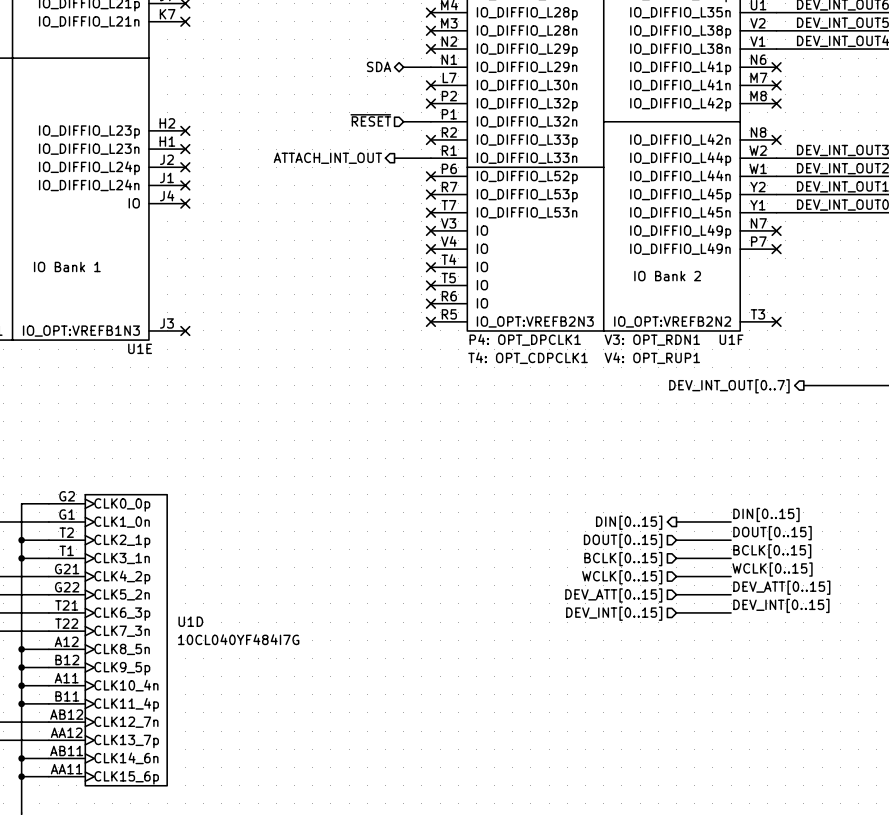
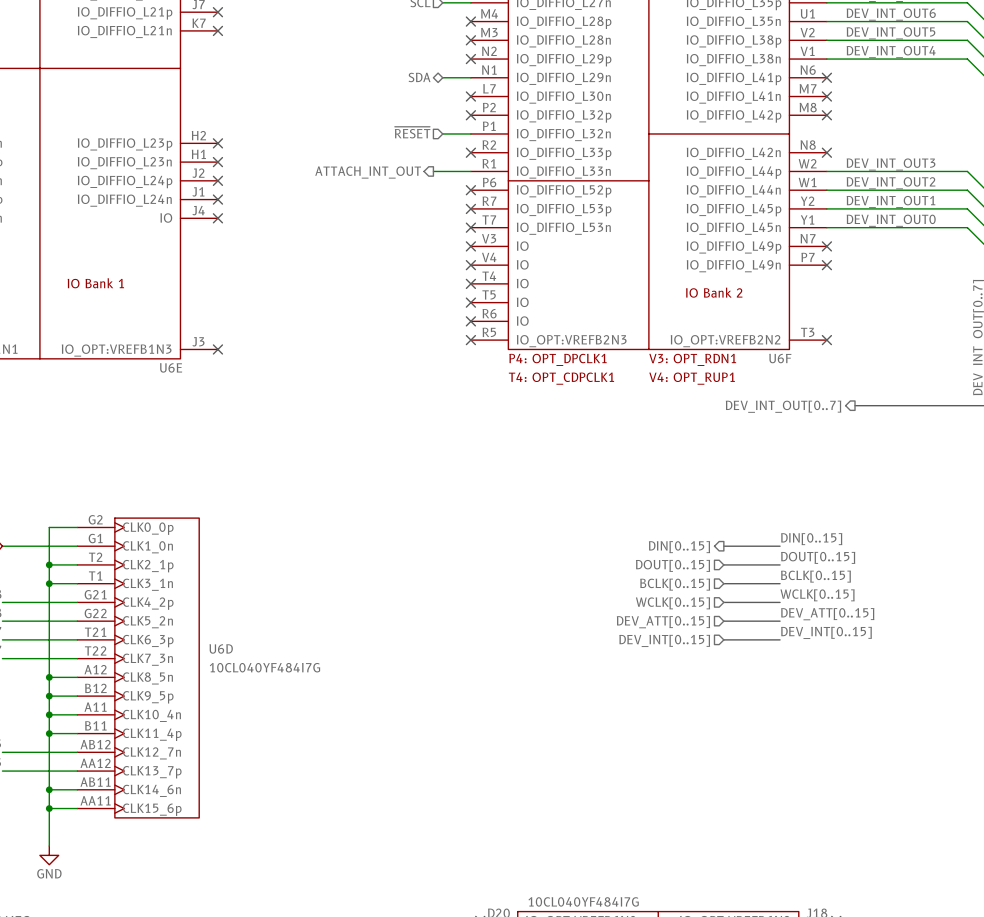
U1F name: U1F (731, 339) -> U6F (780, 358)
U1E name: U1E (140, 348) -> U6E (171, 367)
U1D name: U1D (190, 621) -> U6D (221, 648)

